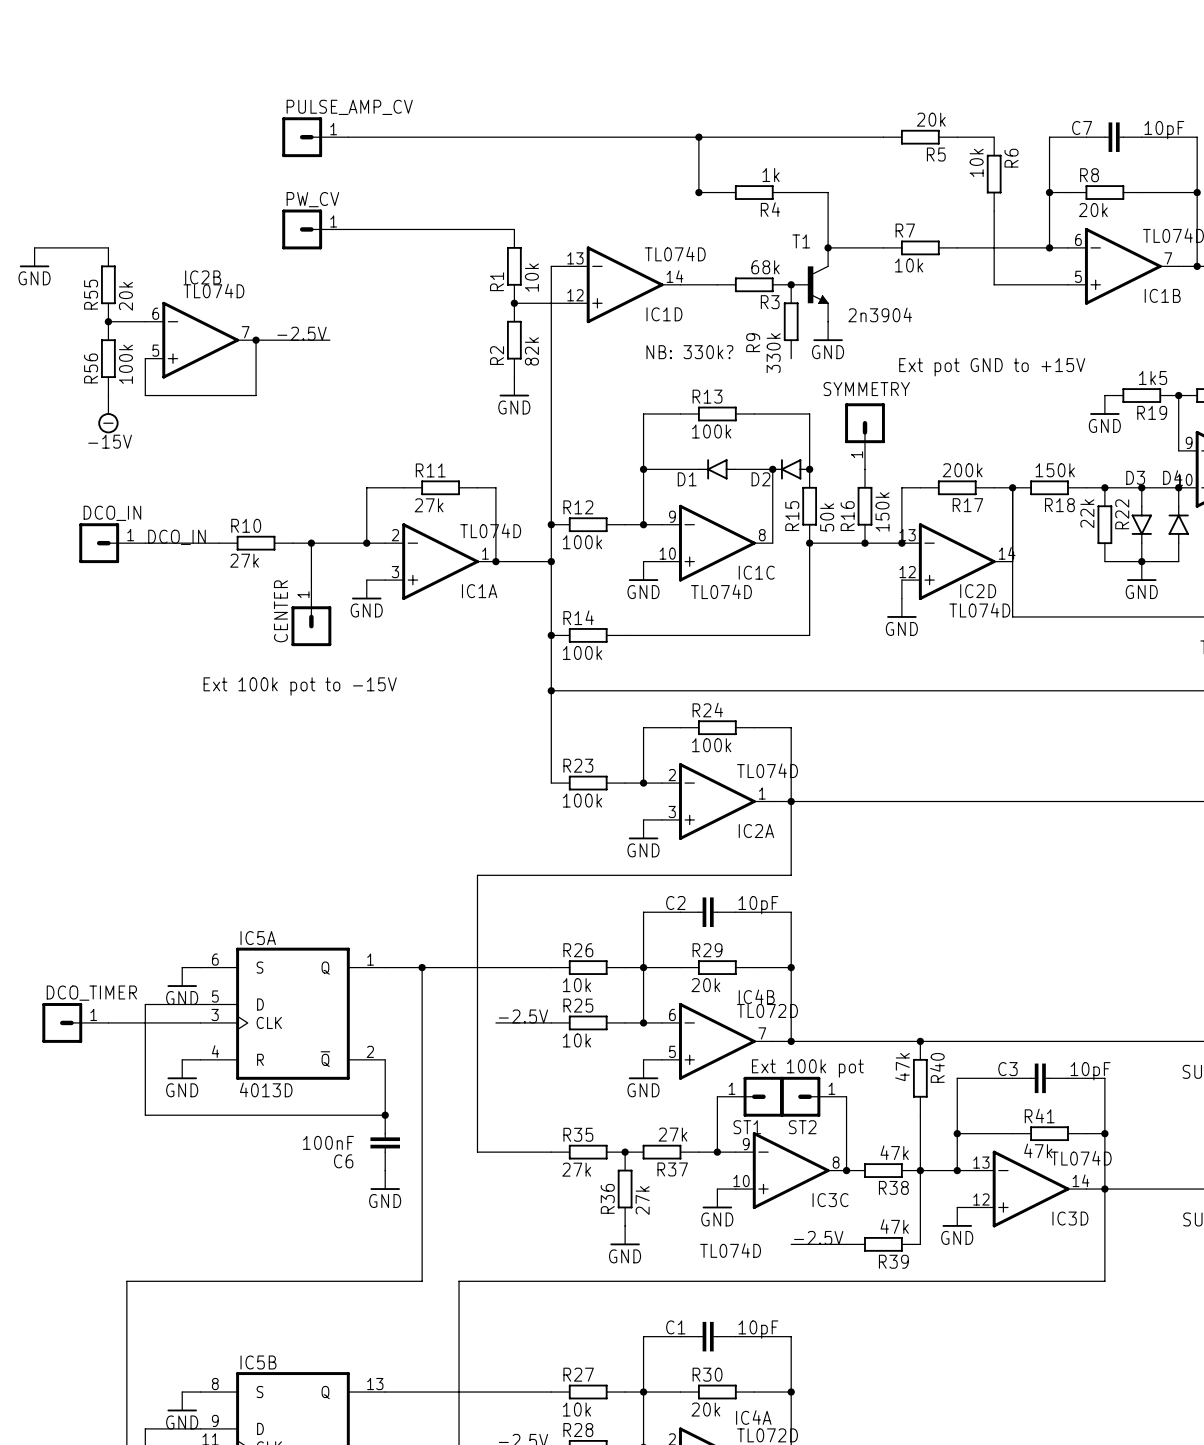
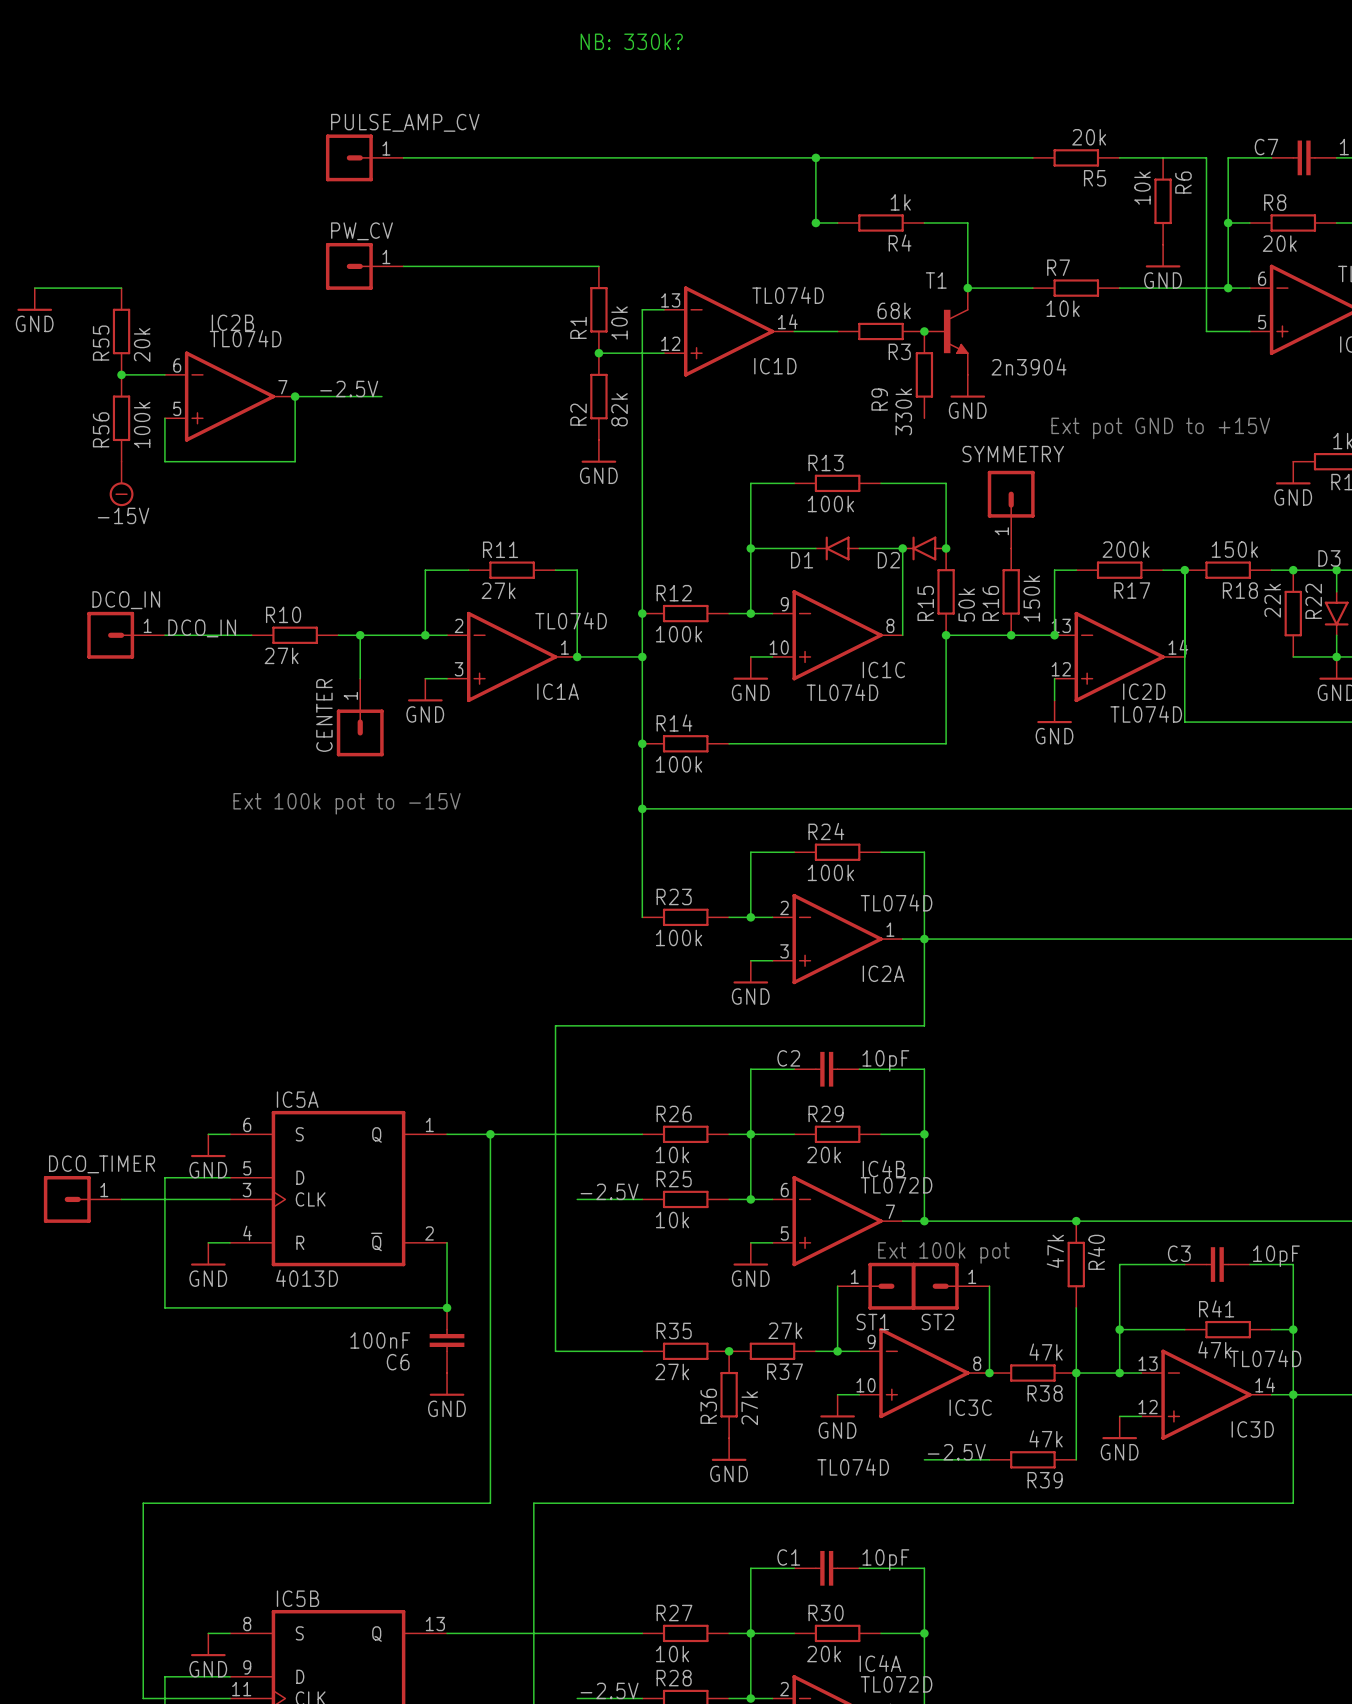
text: none -> NB: 330k? (631, 41)
wire: (994, 211) (994, 284) (1031, 284) -> (1163, 157) (1206, 157) (1206, 331)
power symbol: none -> GND (1163, 256)
text: NB: 330k? (689, 352) -> none

